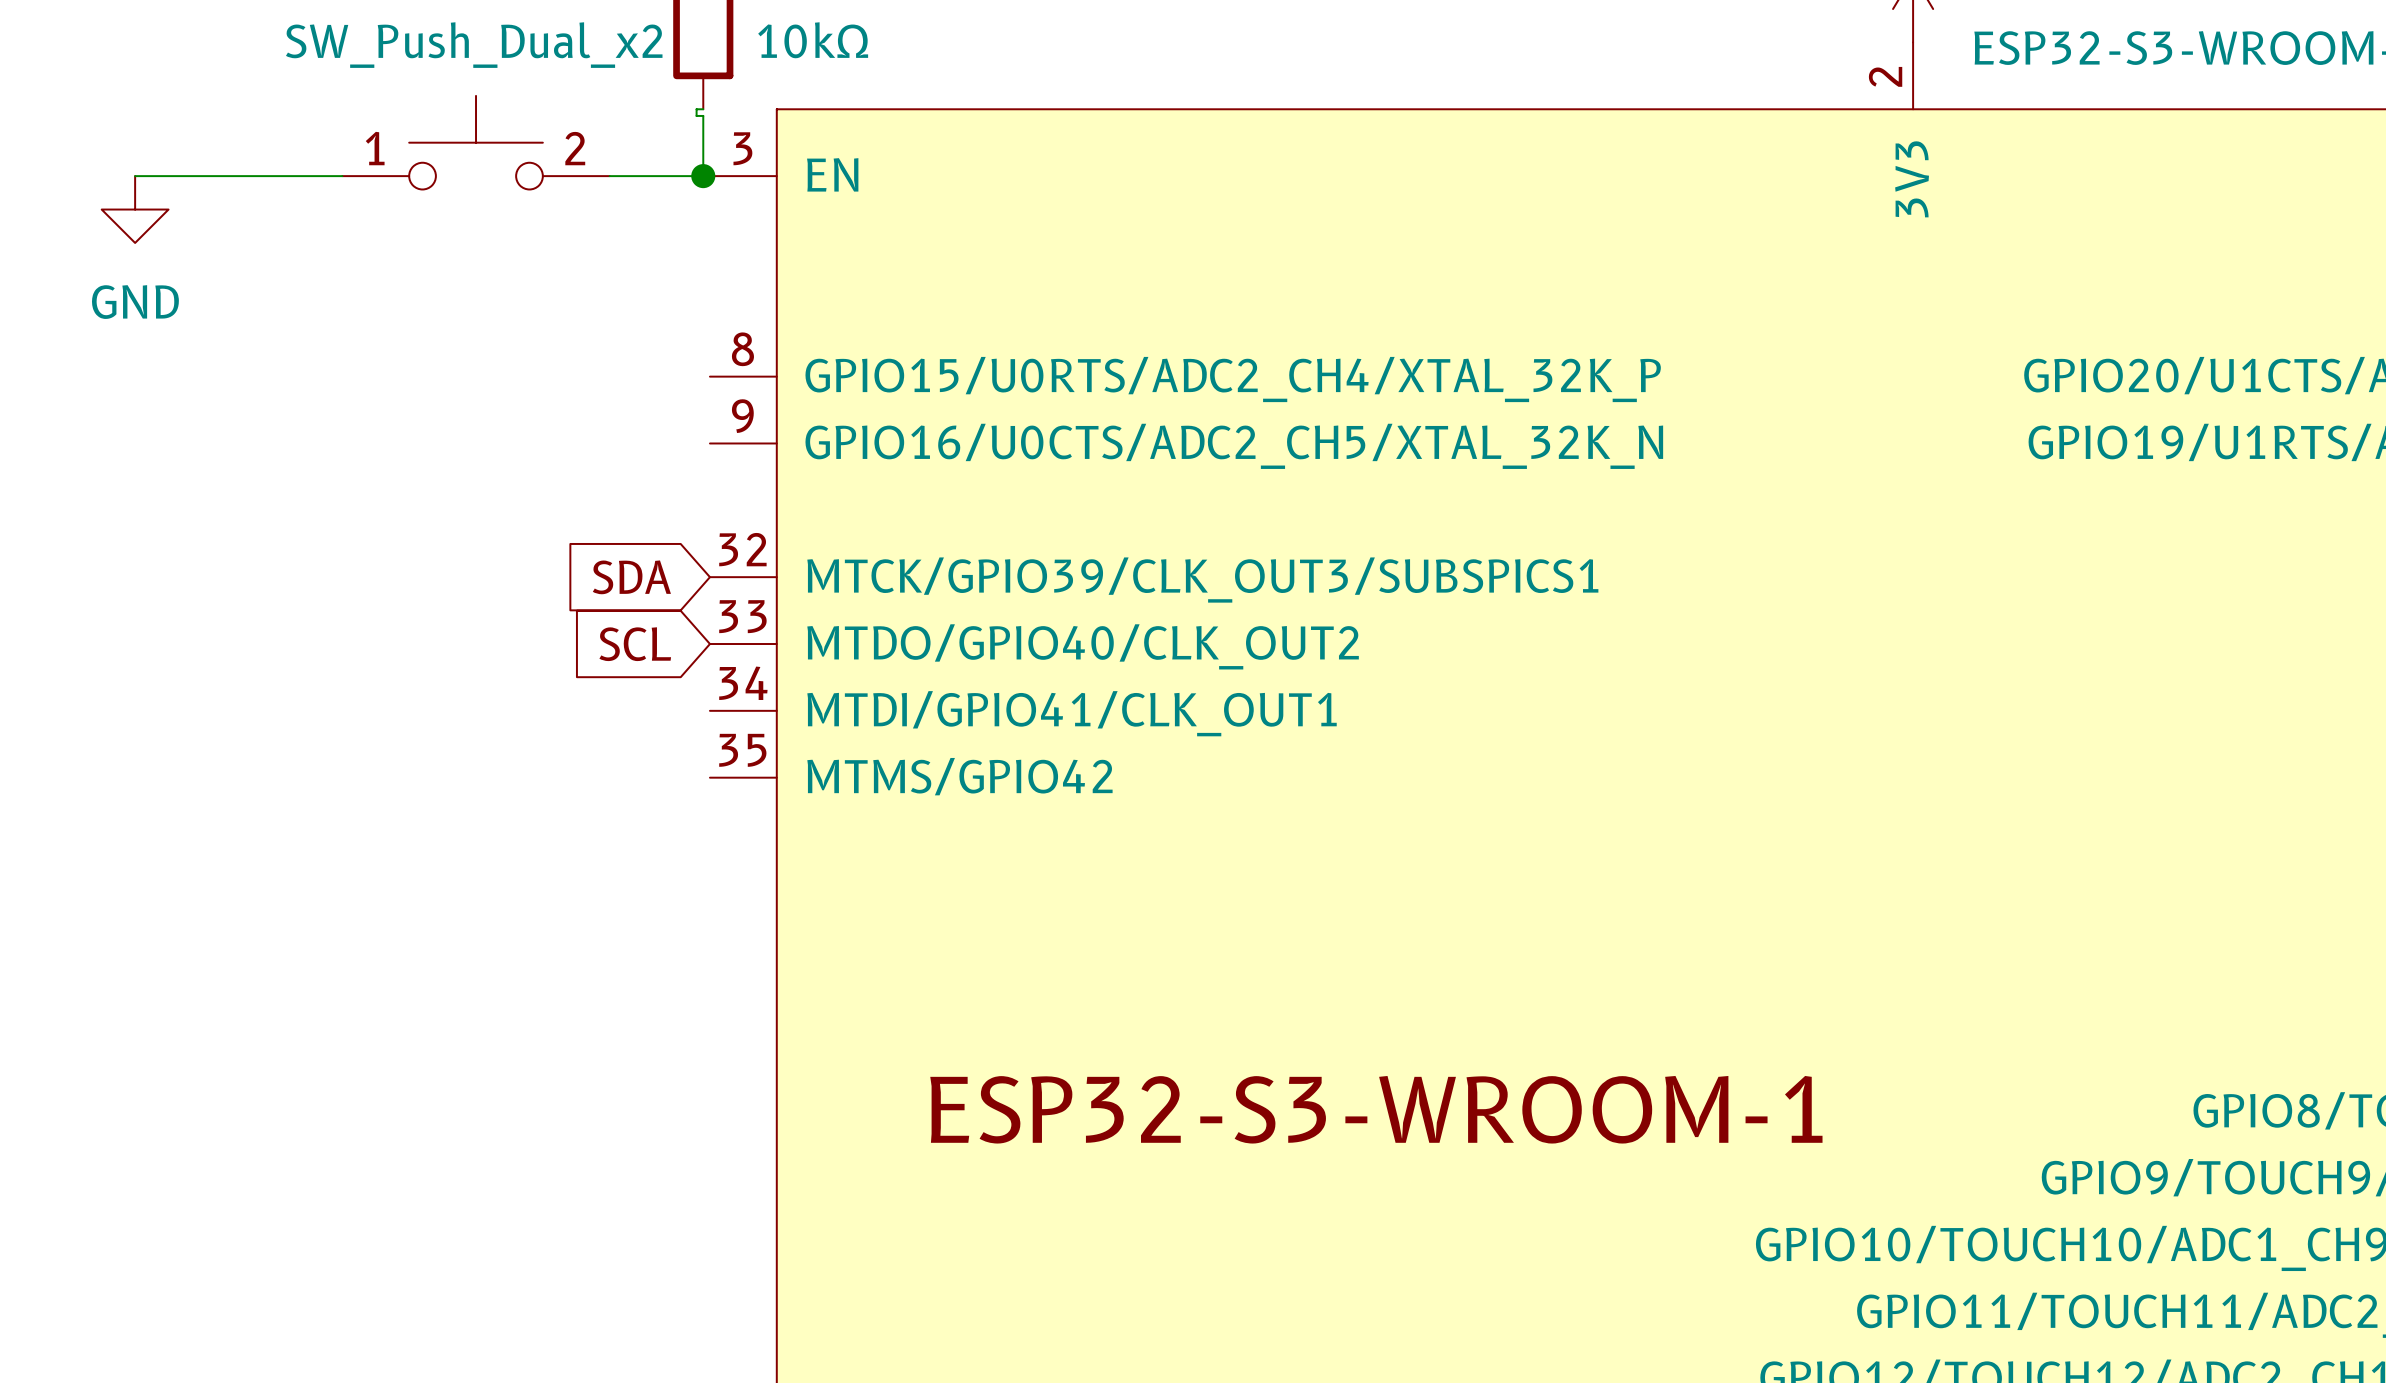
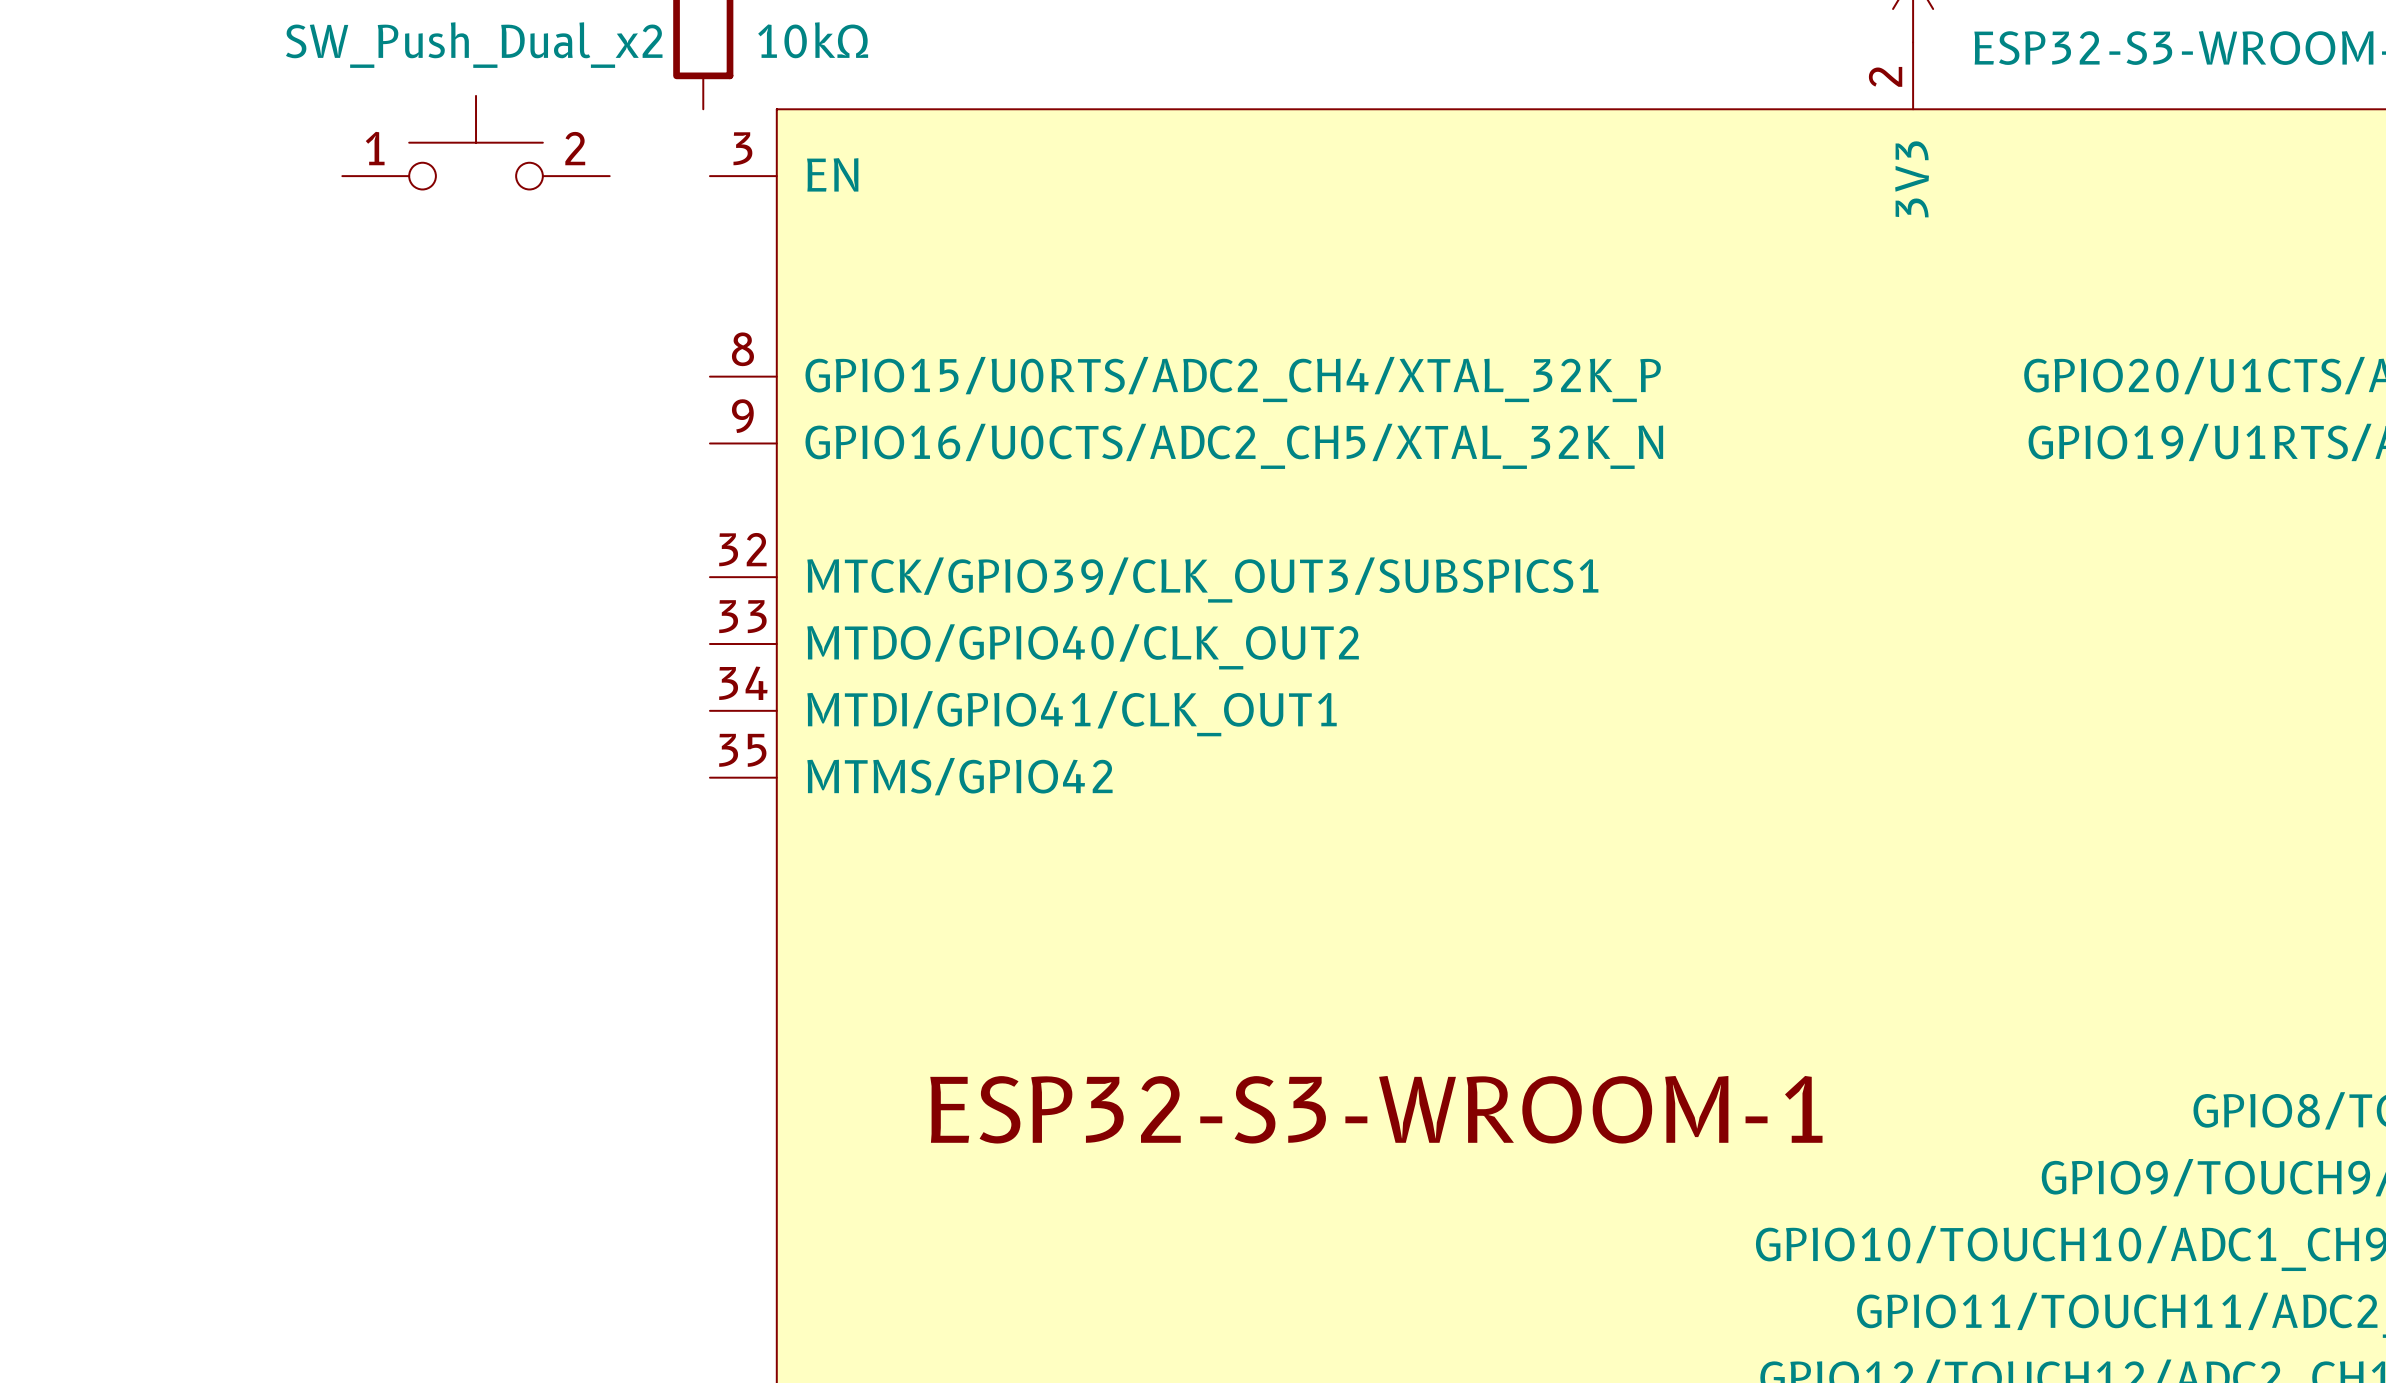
wire: (703, 109) (696, 109) (696, 115) (703, 115) (703, 176) -> none
wire: (135, 176) (342, 176) -> none
wire: (609, 176) (709, 176) -> none
junction: (703, 176) -> none
power symbol: GND (135, 209) -> none
global label: SDA (631, 577) -> none
global label: SCL (635, 644) -> none

